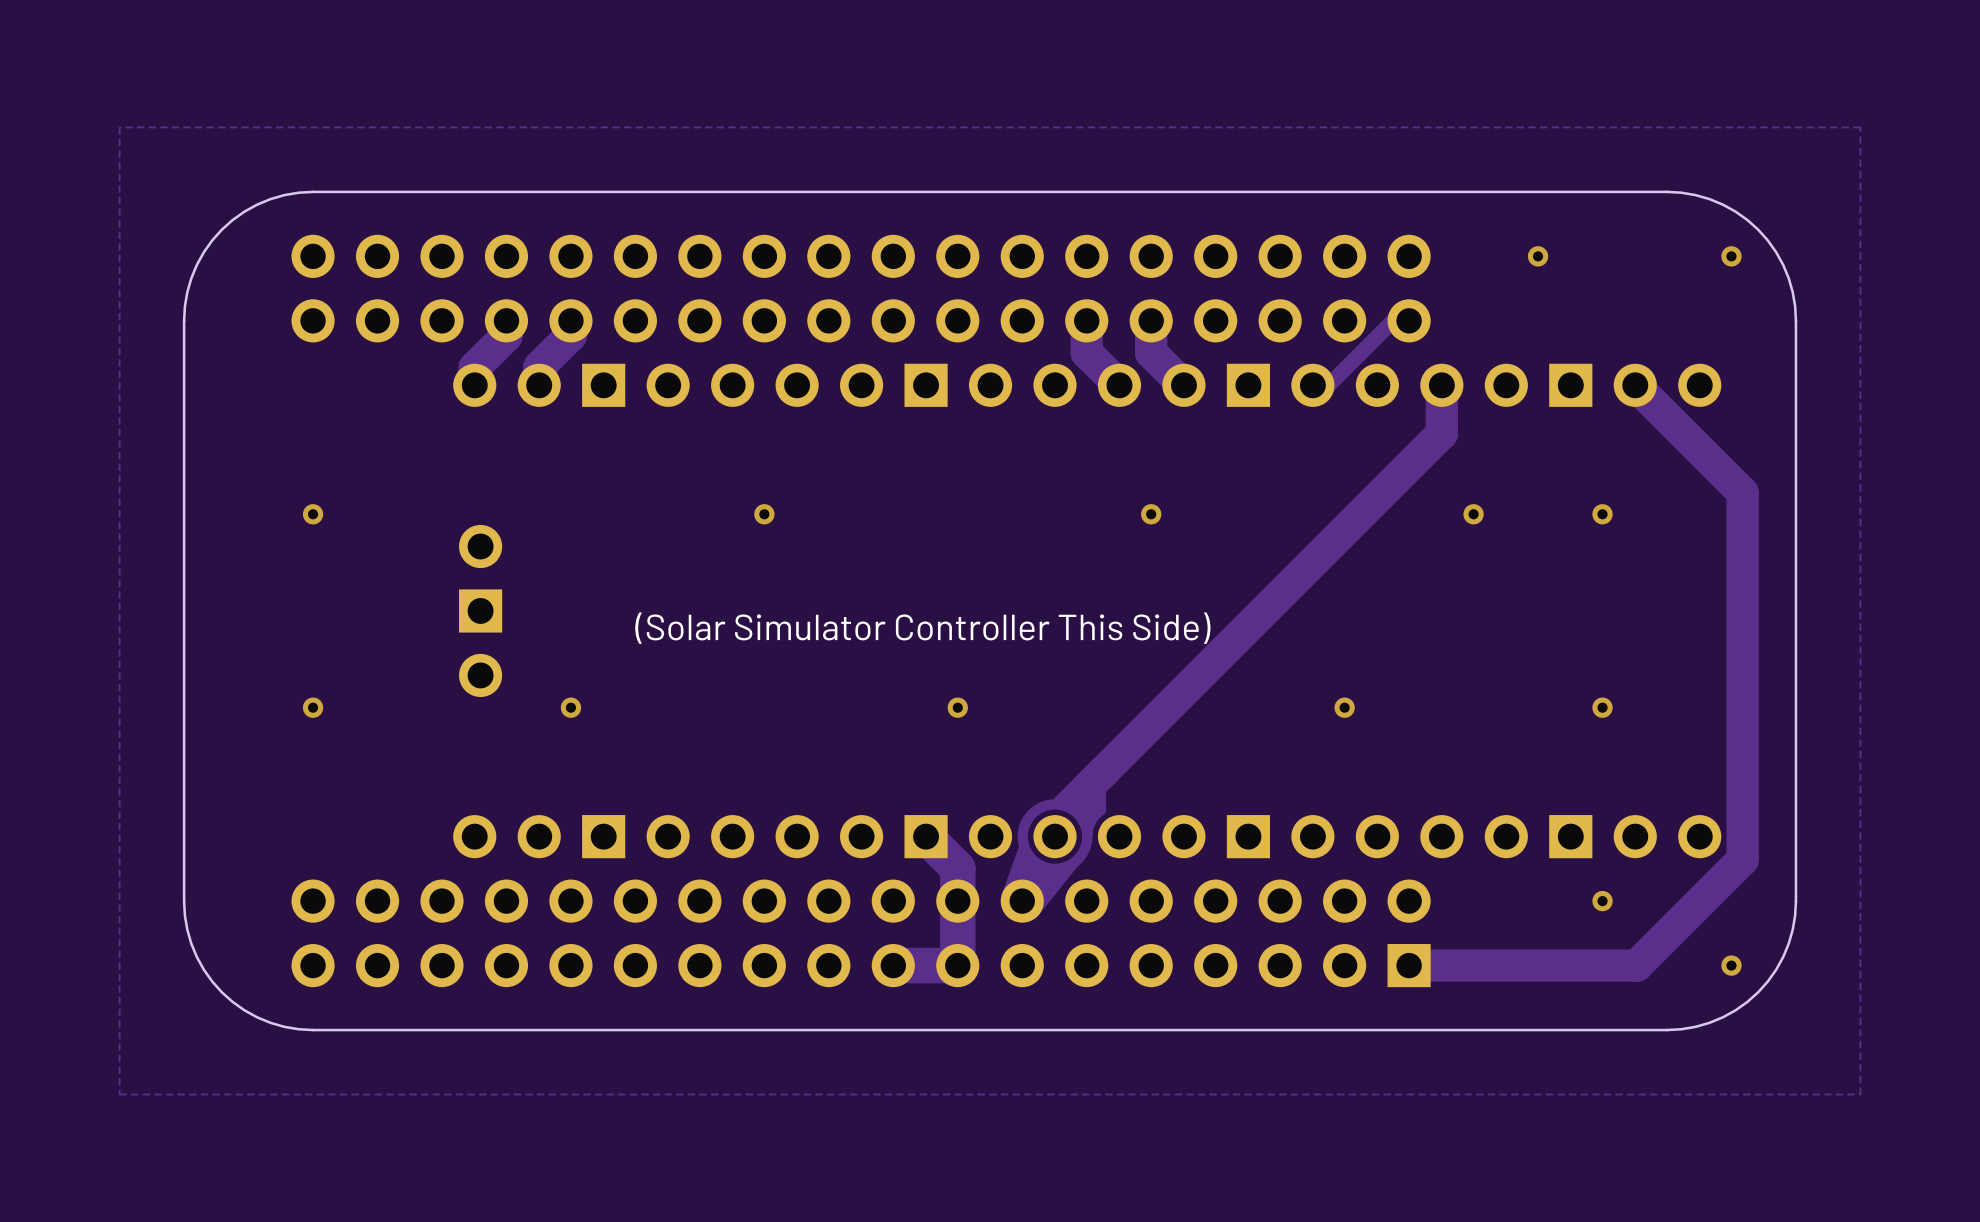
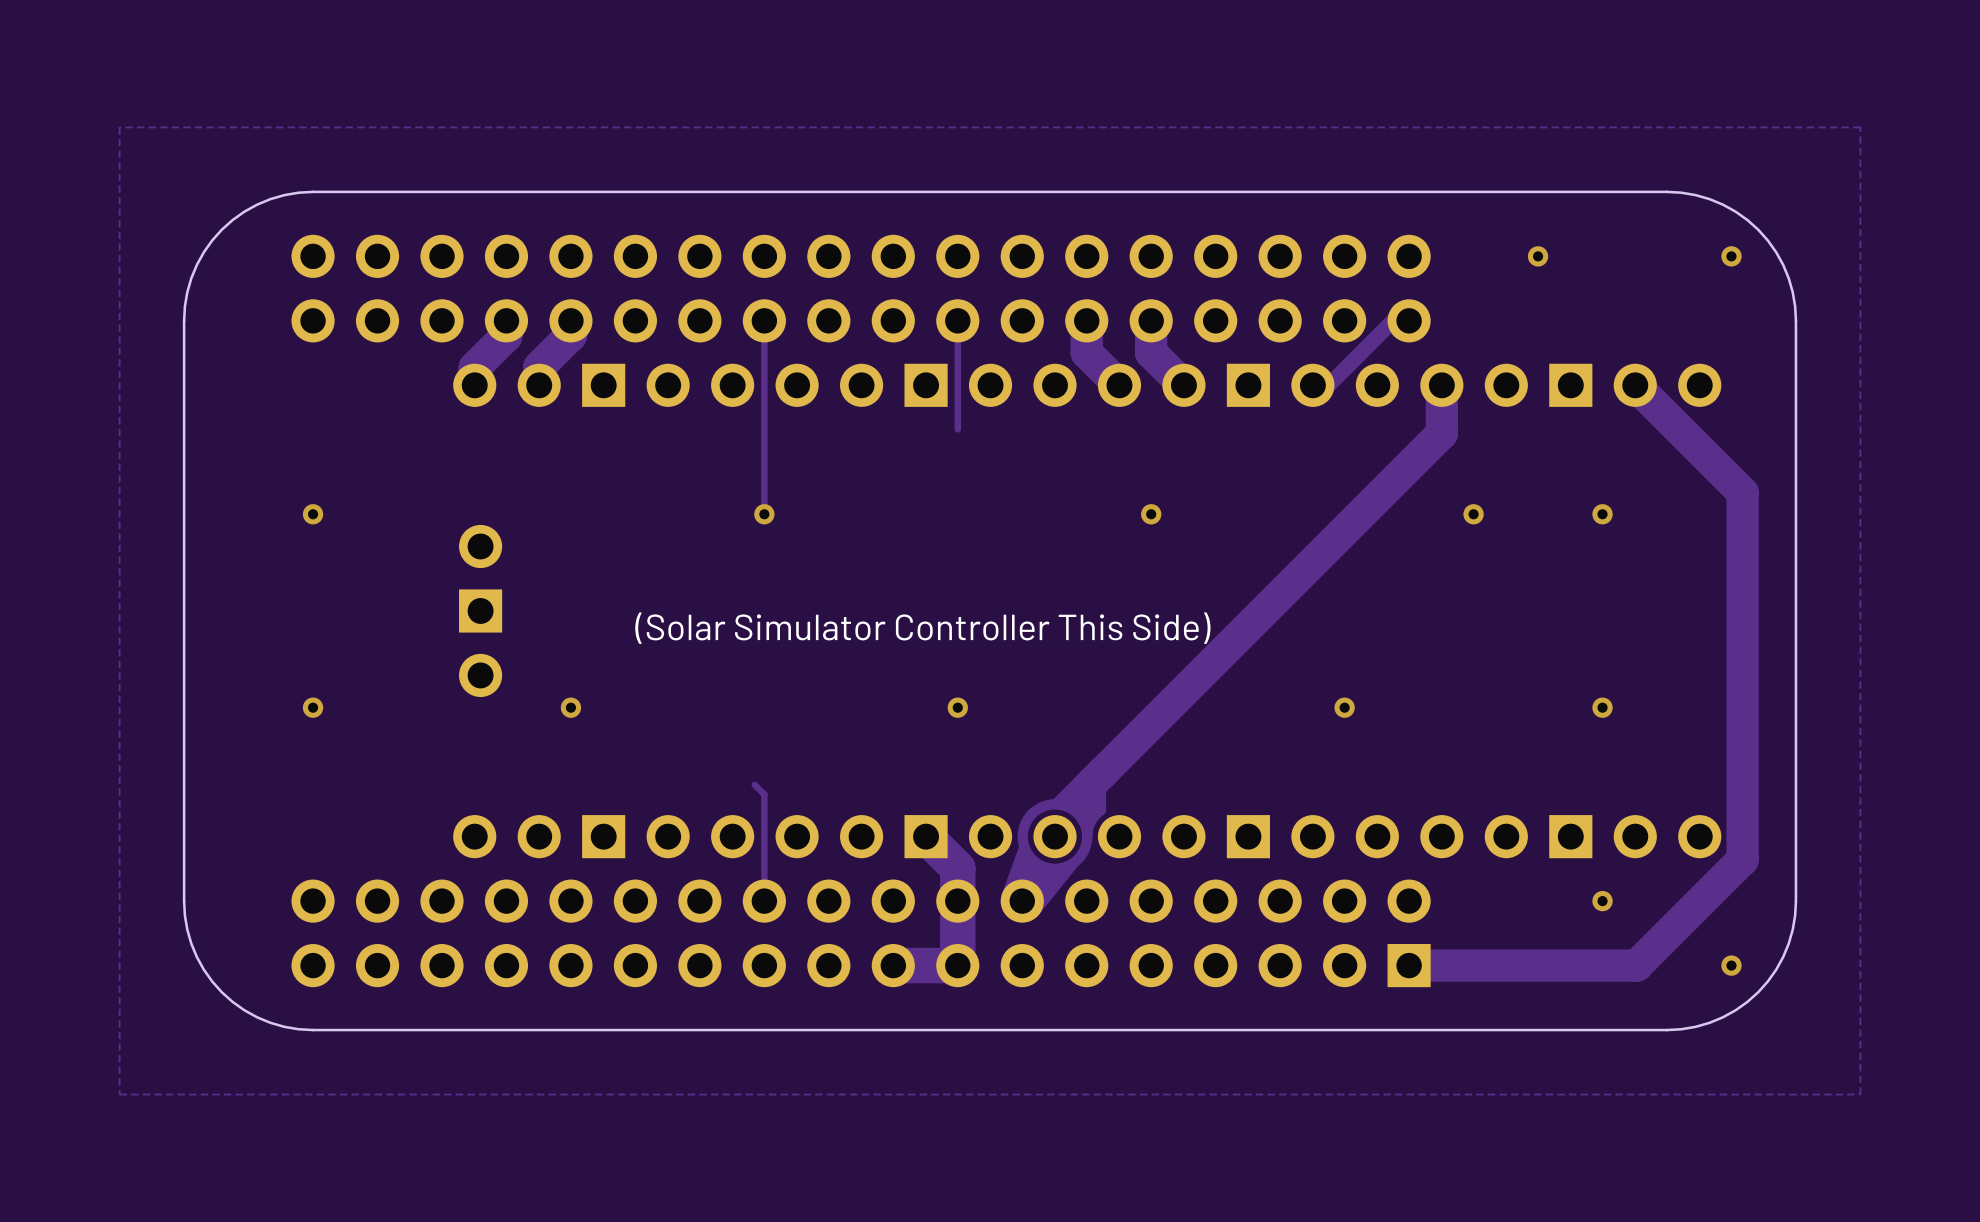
track: none -> (764, 320) (764, 514)
track: none -> (957, 320) (957, 429)
track: none -> (754, 784) (764, 794) (764, 901)

